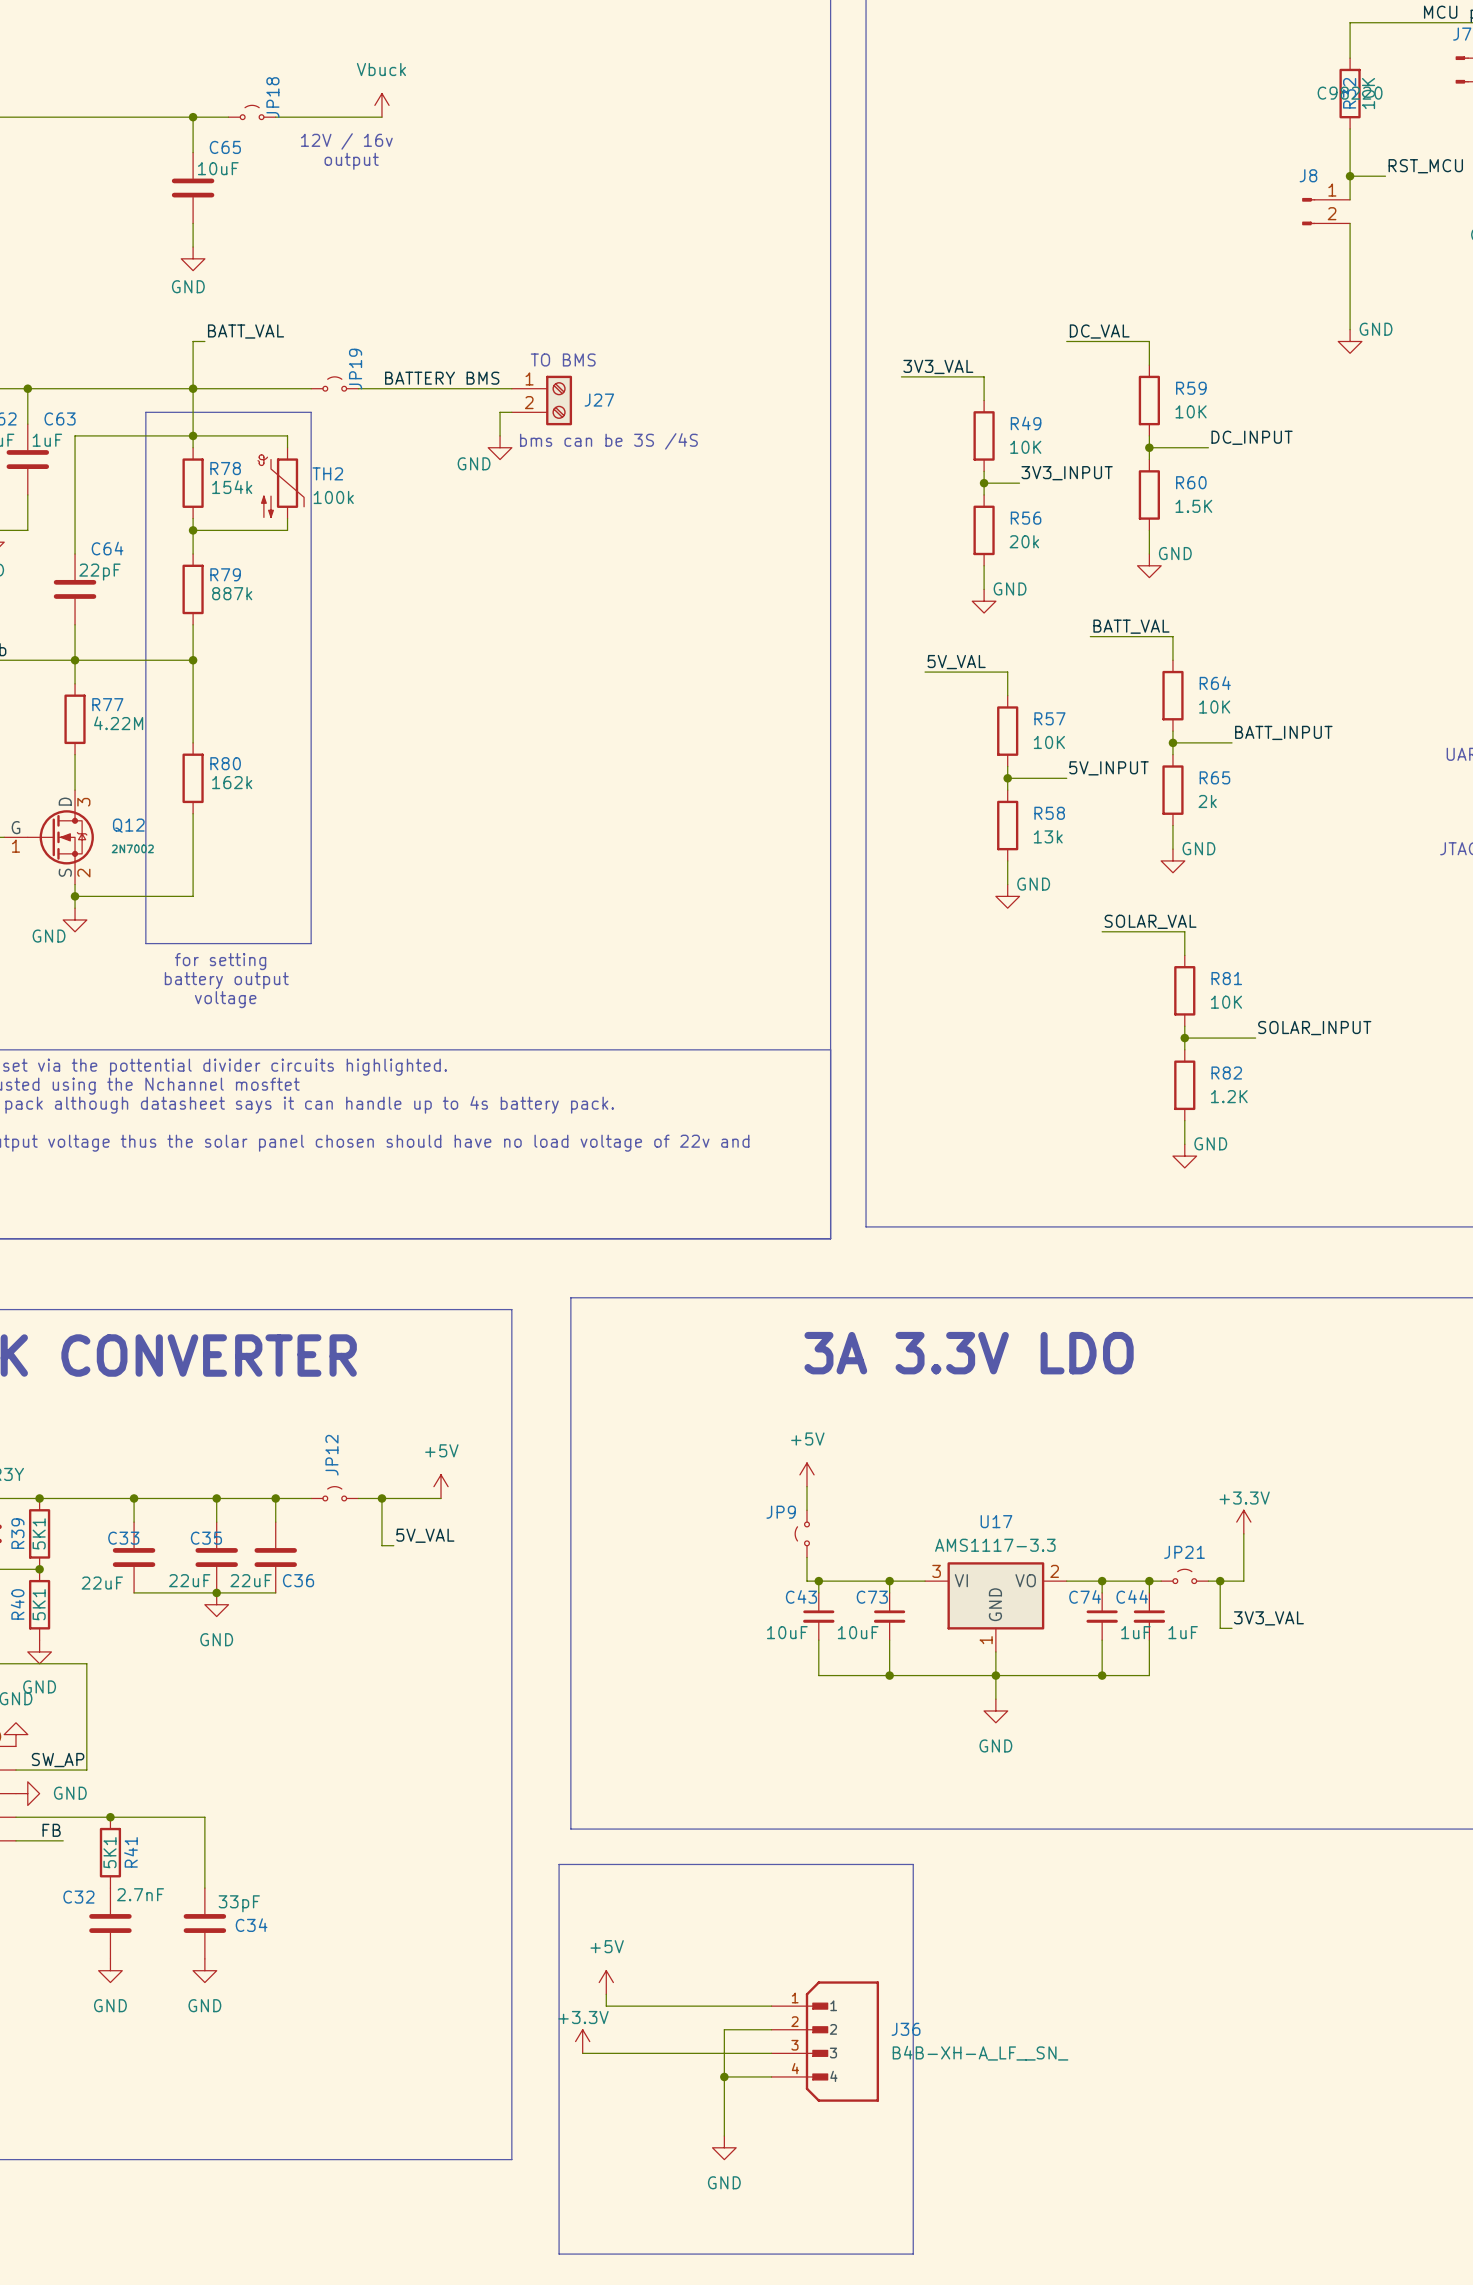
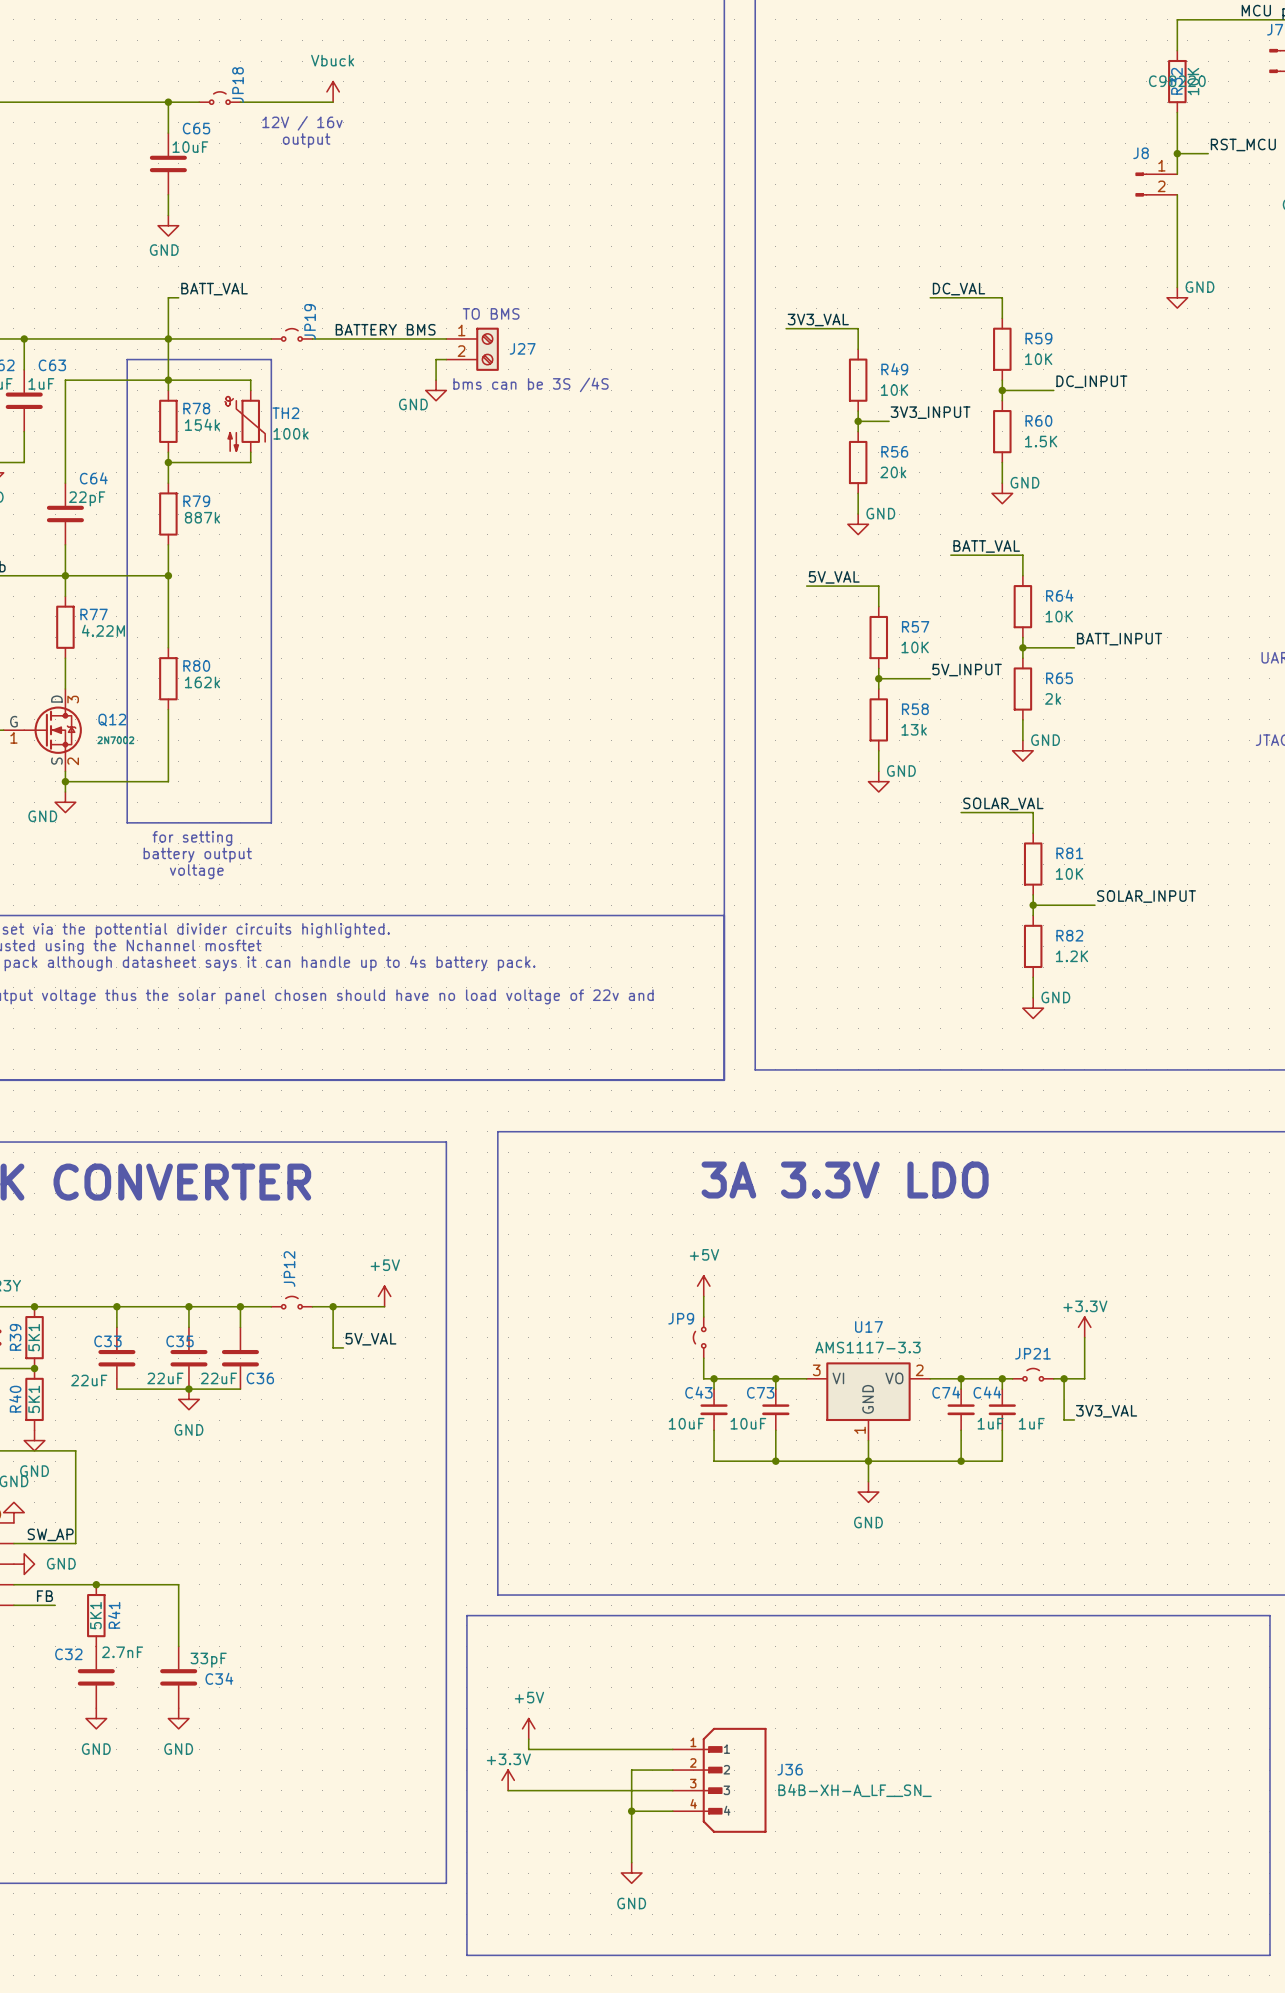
line: none -> (466, 1615) (1269, 1615) (1269, 1955) (466, 1955) (466, 1615)
line: (559, 1864) (913, 1864) (913, 2254) (559, 2254) (559, 1864) -> none

